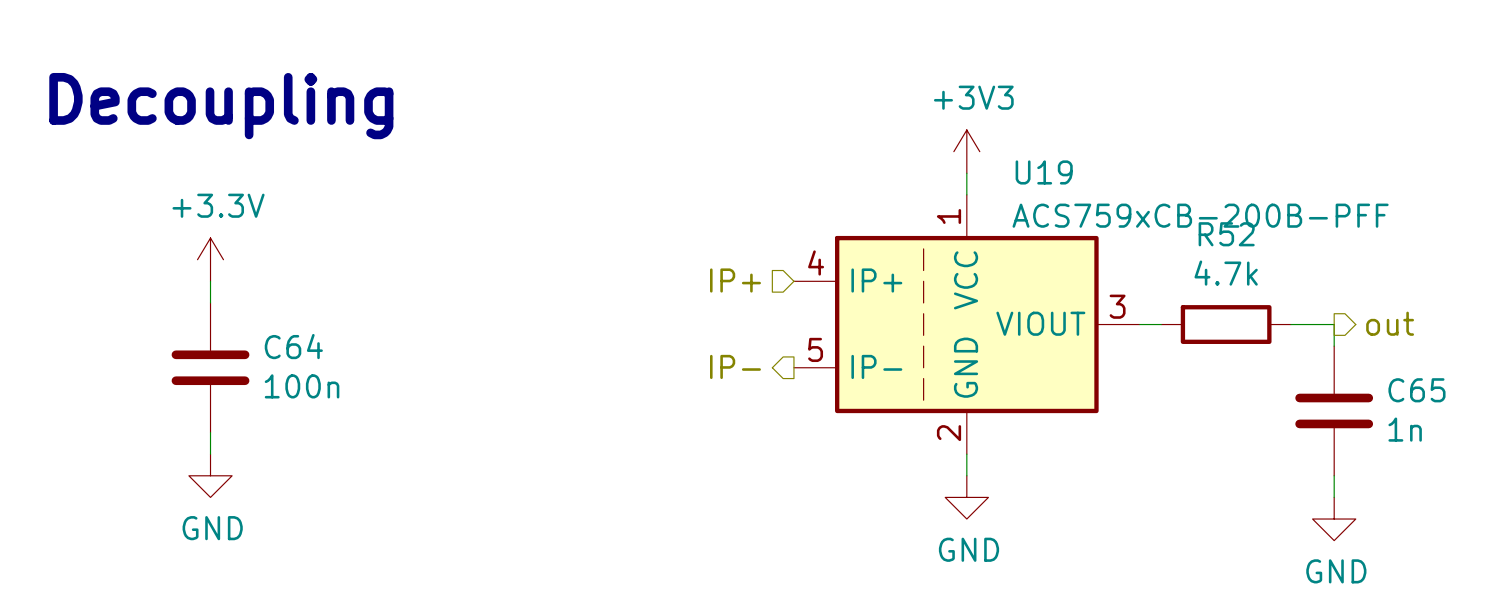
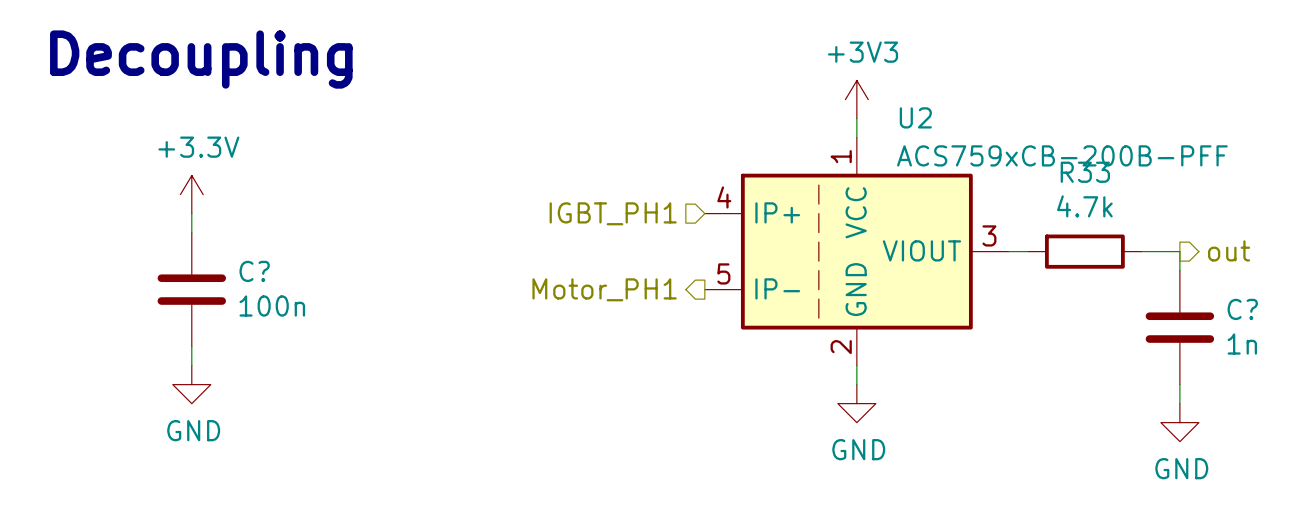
U19 name: U19 (1044, 172) -> U2 (915, 117)
R52 name: R52 (1226, 234) -> R33 (1085, 172)
hierarchical label: IP+ (735, 280) -> IGBT_PH1 (613, 213)
C64 name: C64 (293, 346) -> C? (254, 271)
hierarchical label: IP- (735, 366) -> Motor_PH1 (604, 289)
C65 name: C65 (1416, 390) -> C? (1242, 309)

